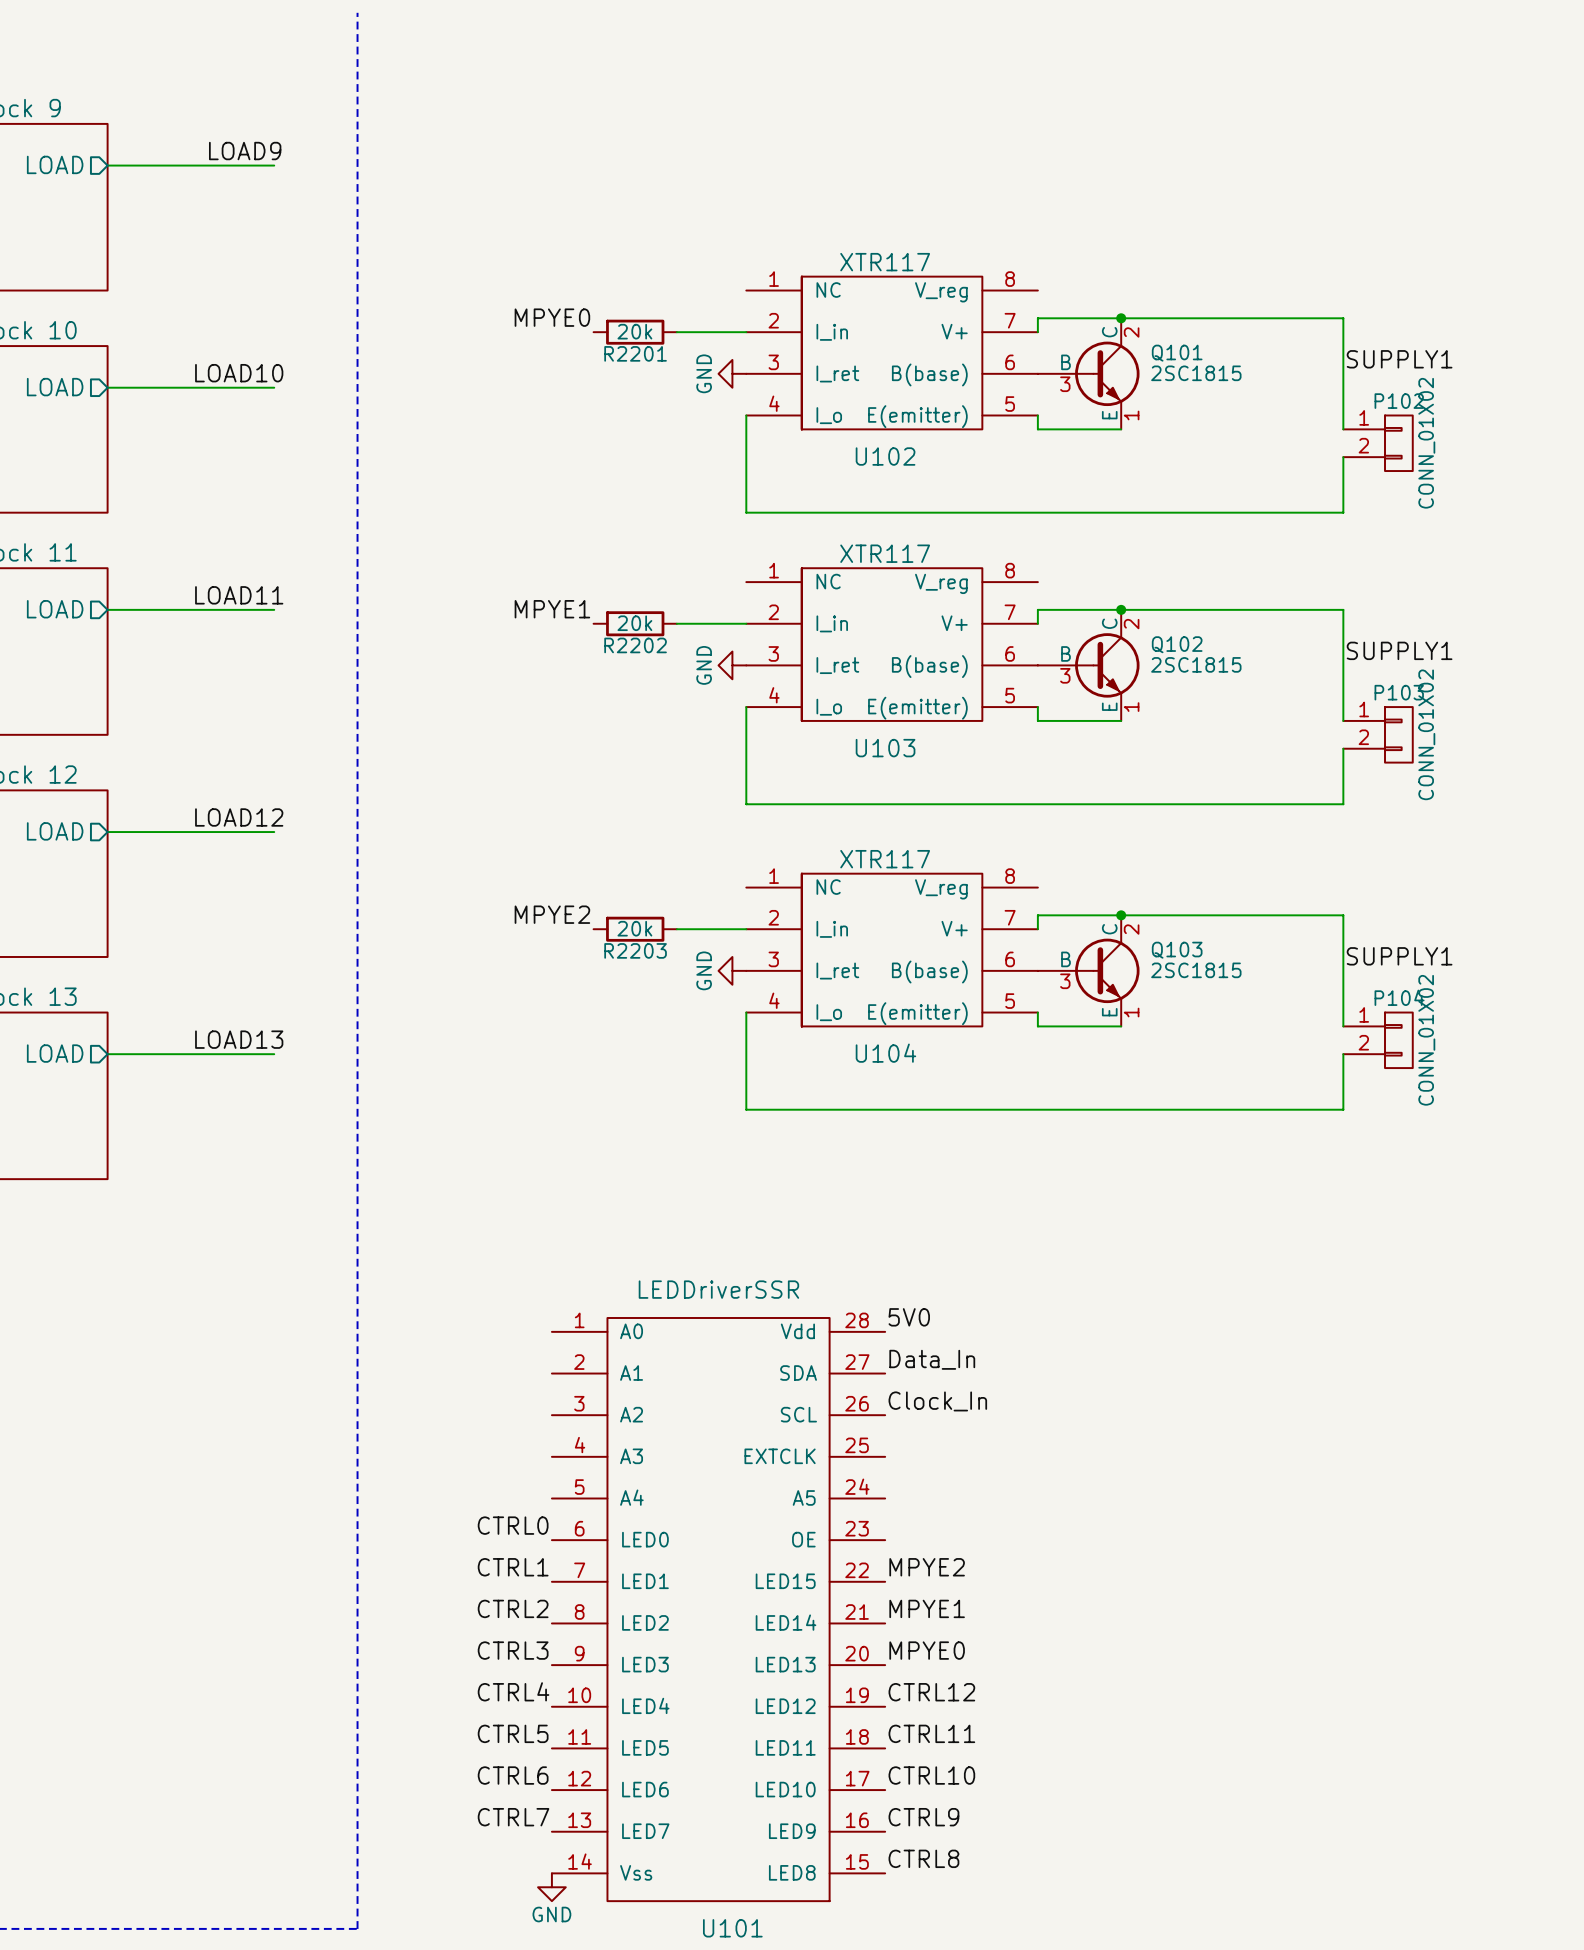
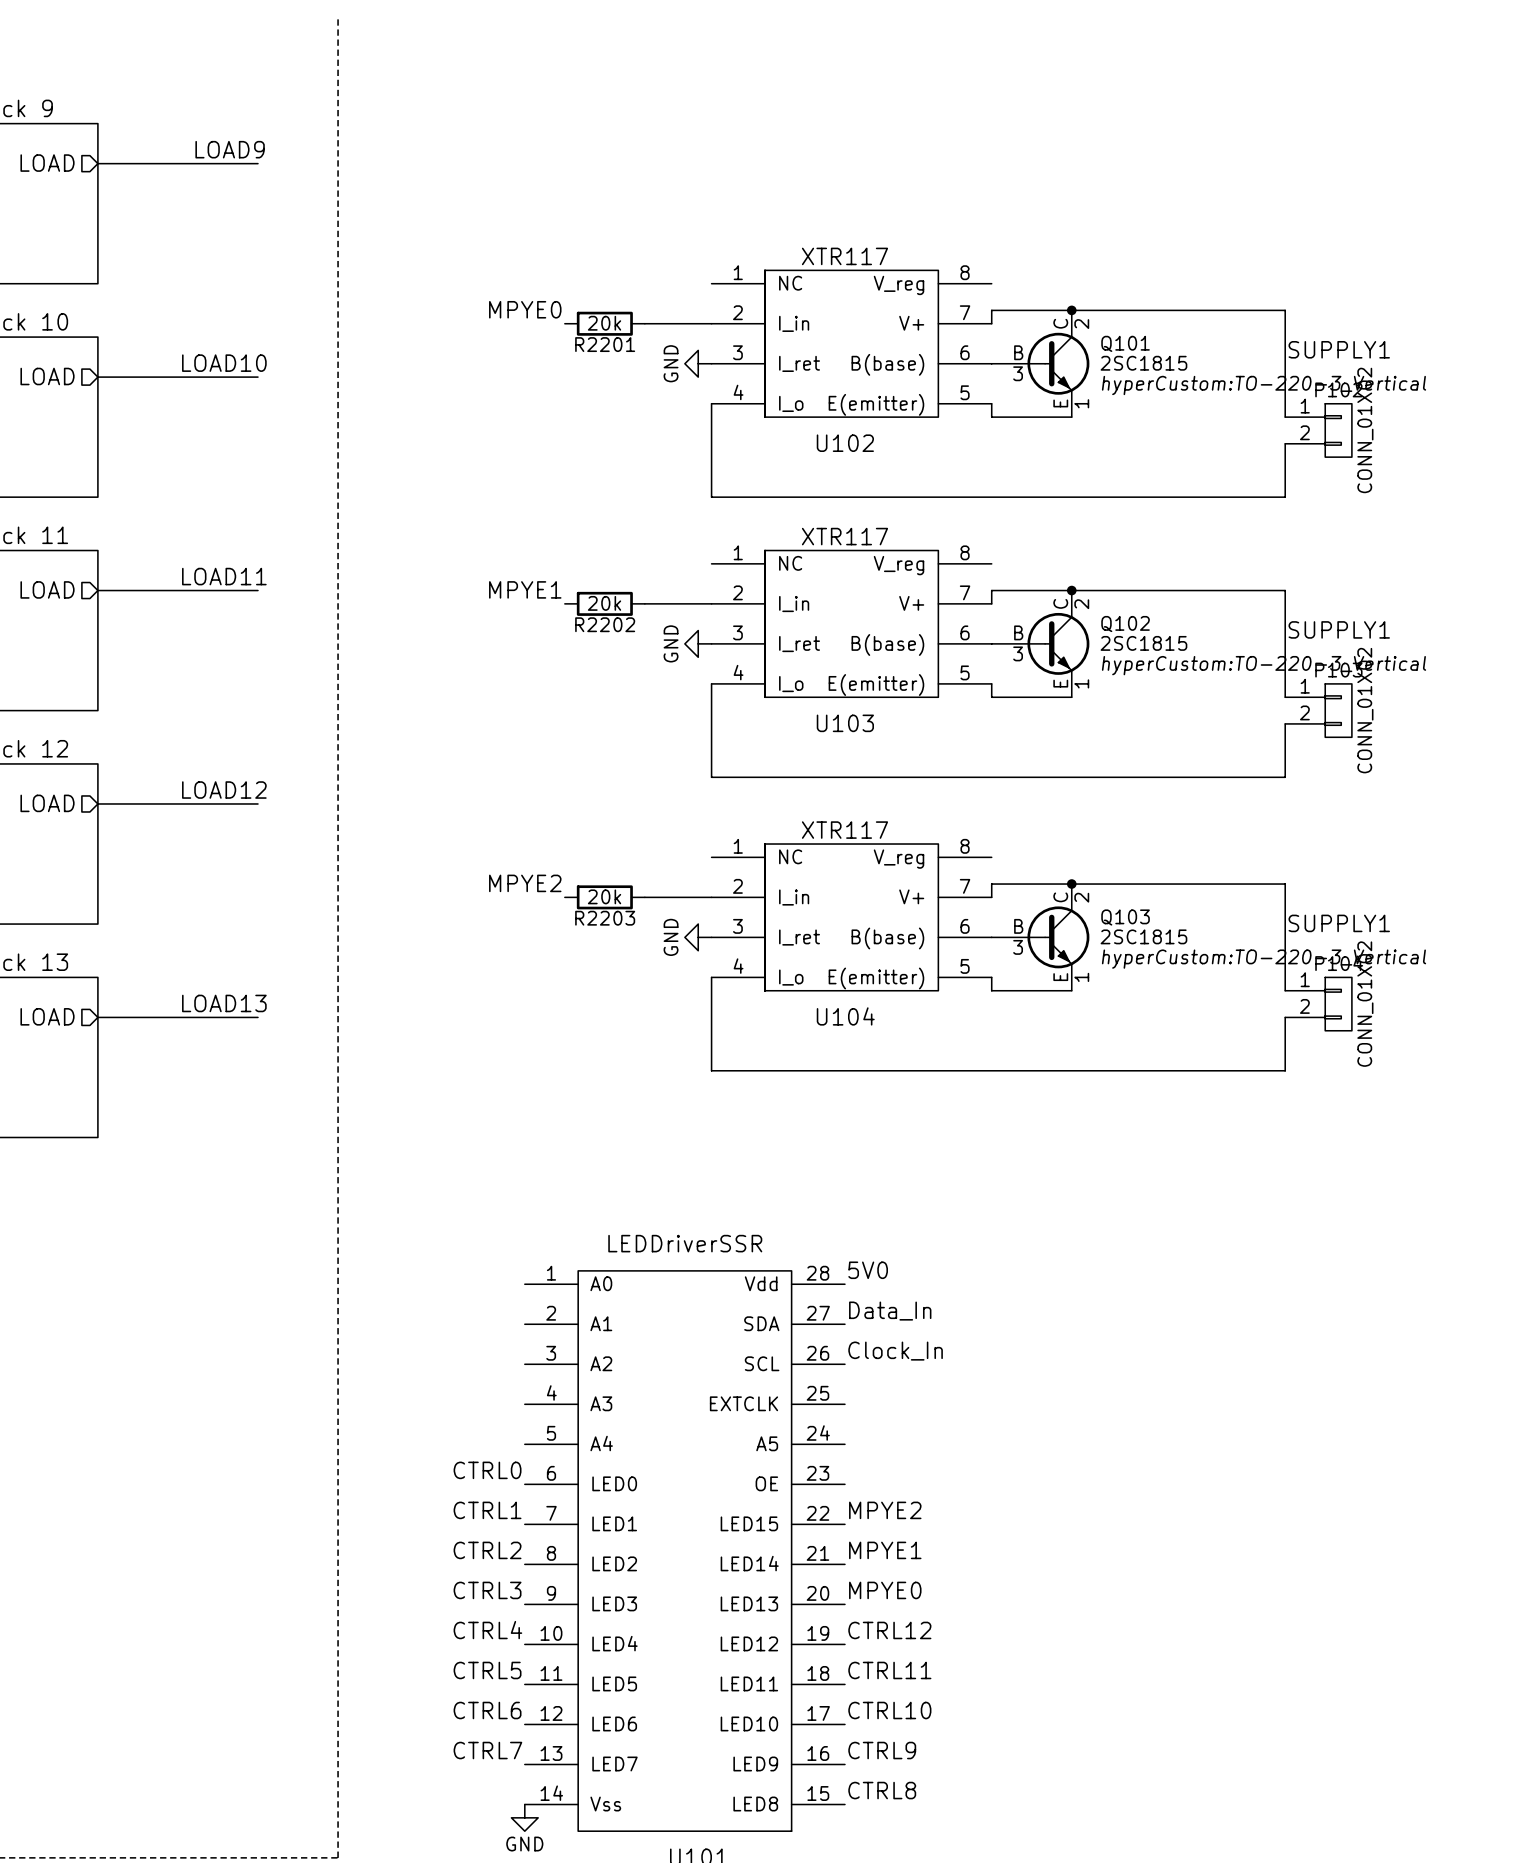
Q101 text: none -> hyperCustom:TO-220-3_Vertical (1264, 385)
Q102 text: none -> hyperCustom:TO-220-3_Vertical (1264, 665)
Q103 text: none -> hyperCustom:TO-220-3_Vertical (1264, 959)

